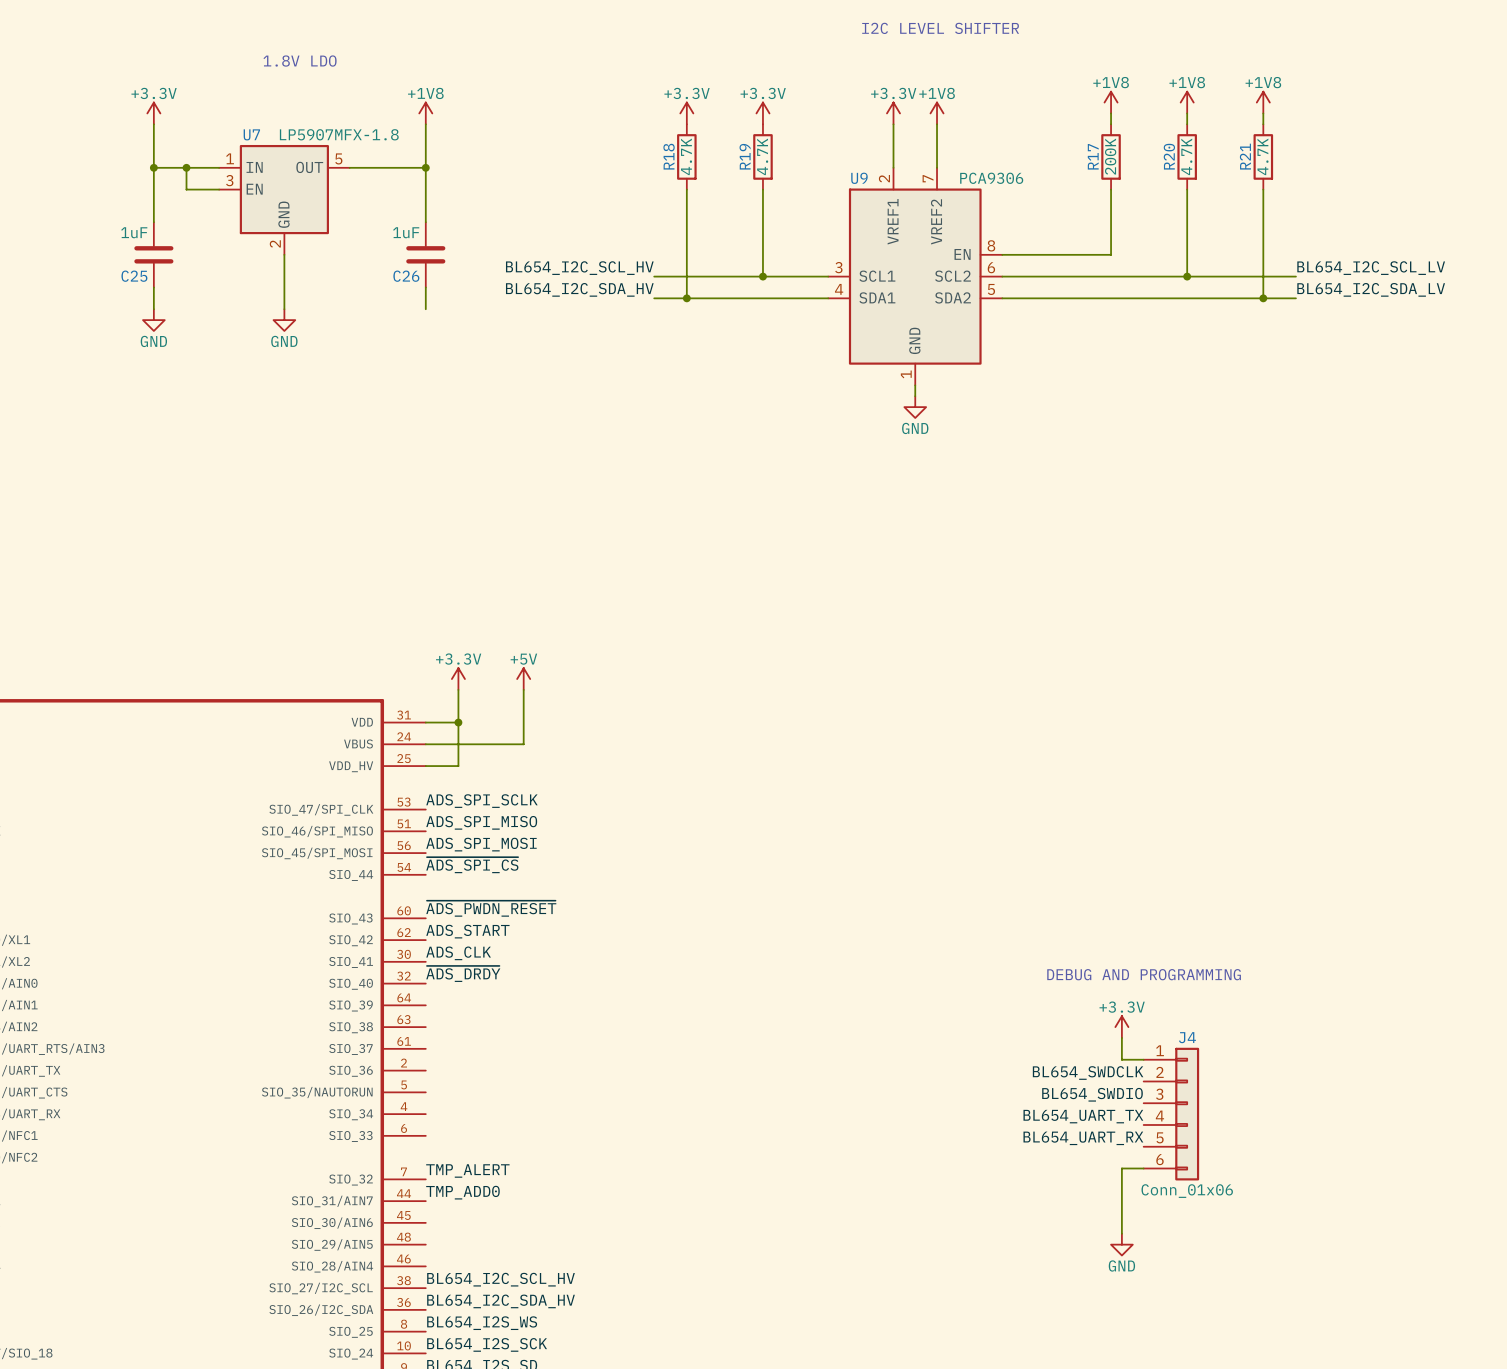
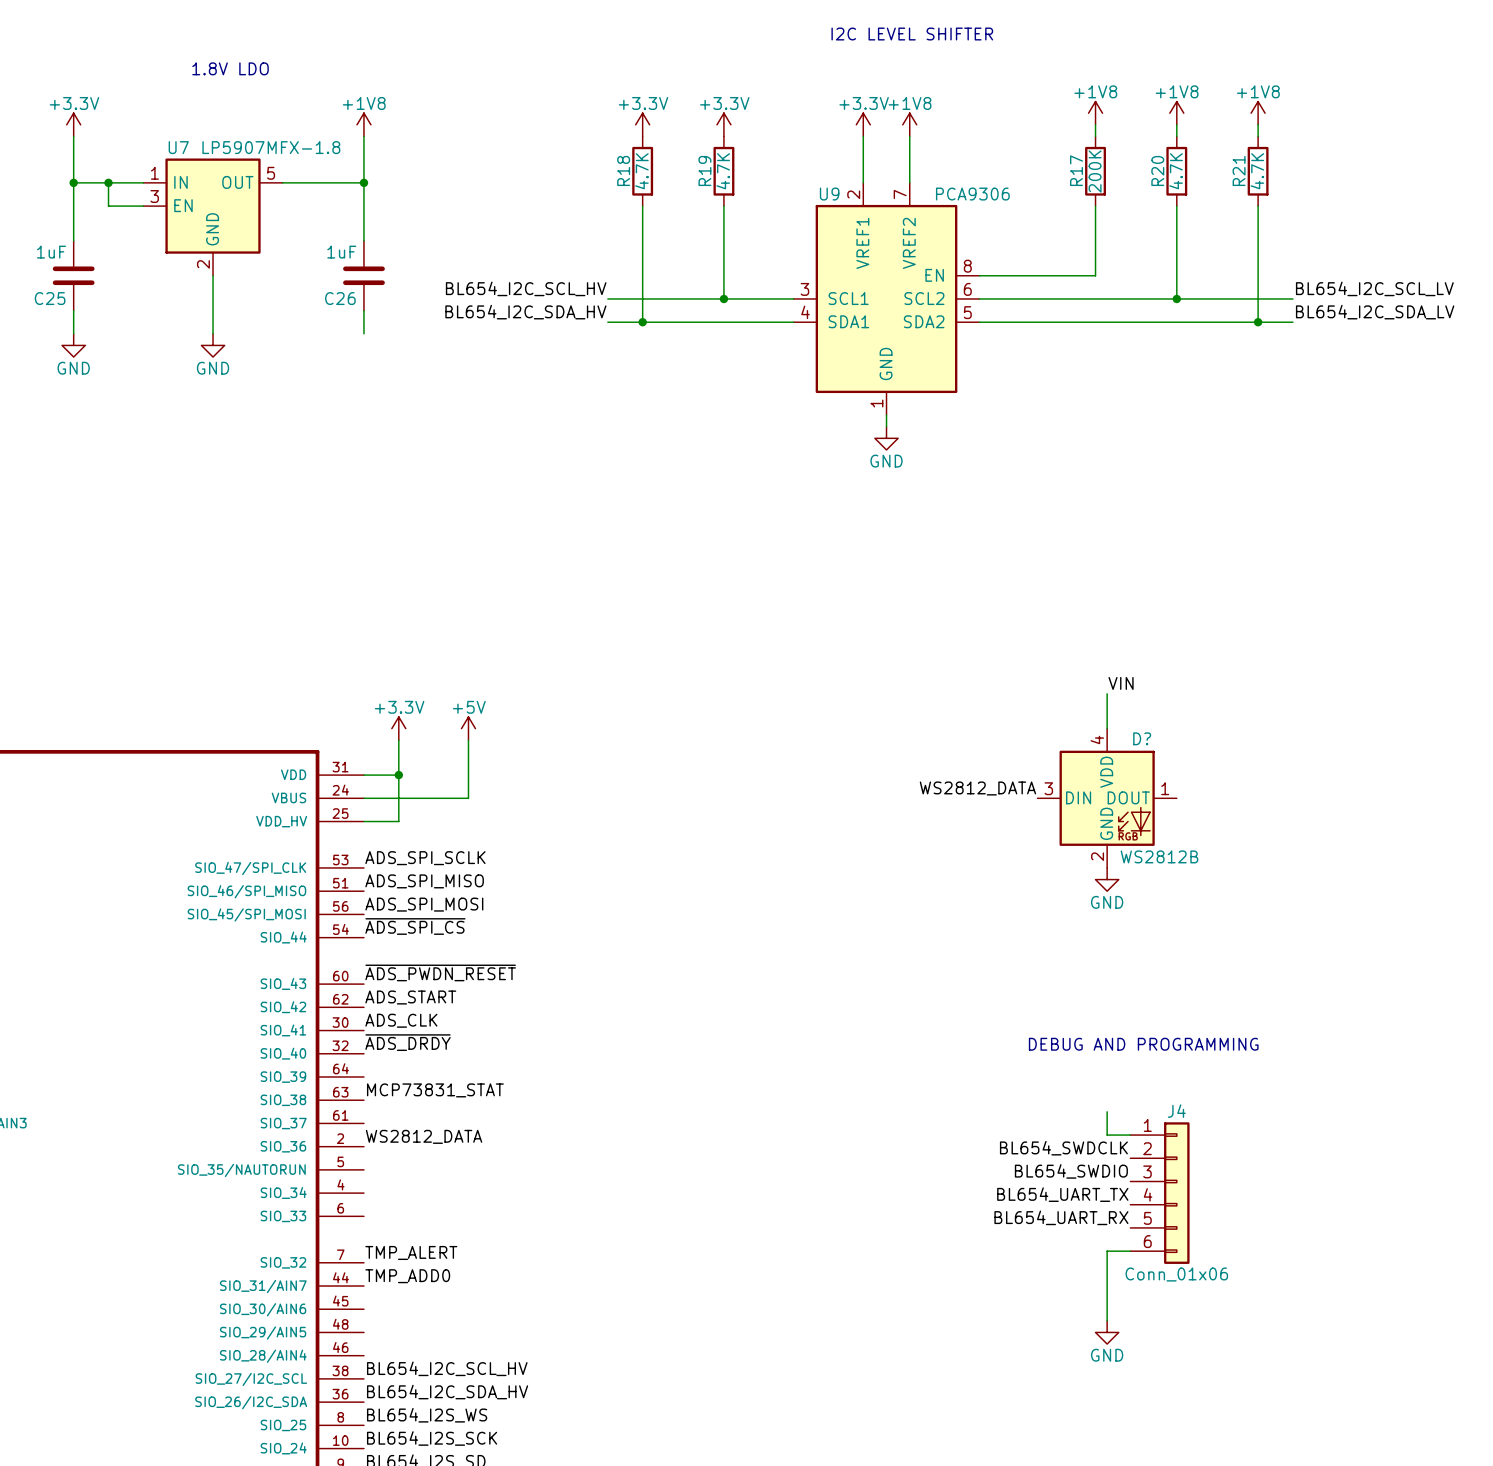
label: none -> VIN (1121, 683)
wire: none -> (1107, 693) (1107, 728)
label: none -> WS2812_DATA (977, 788)
D?: none -> WS2812B (1107, 798)
power symbol: none -> GND (1107, 879)
label: none -> MCP73831_STAT (435, 1090)
power symbol: +3.3V (1121, 1027) -> none
label: none -> WS2812_DATA (424, 1136)

